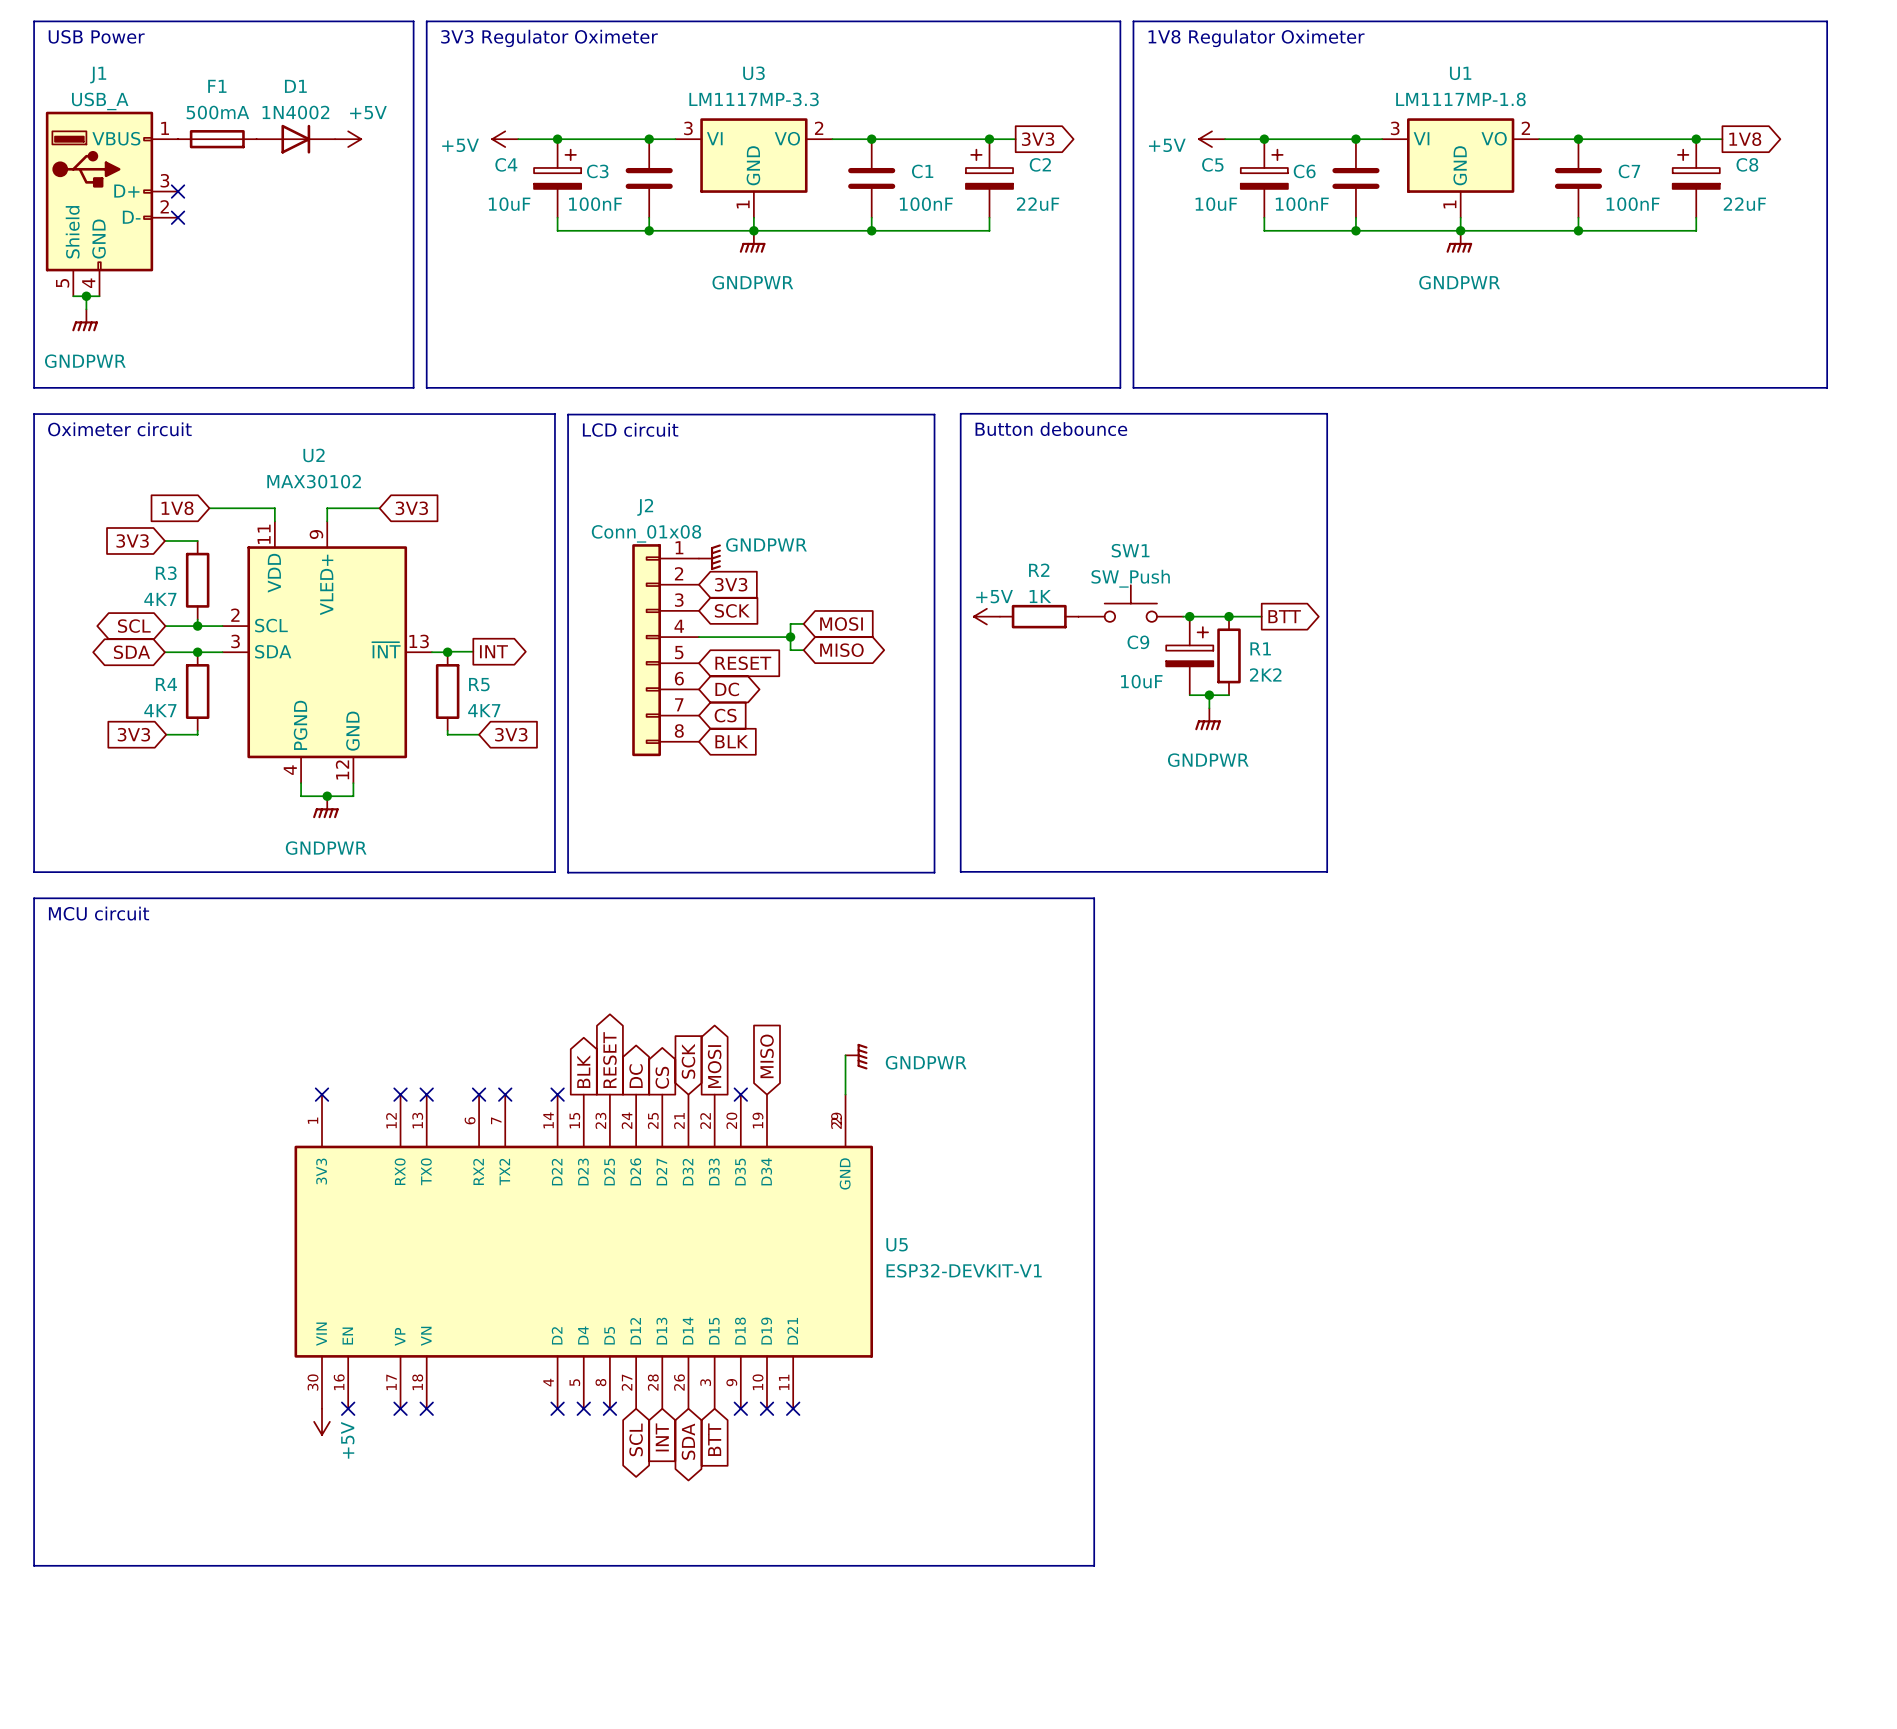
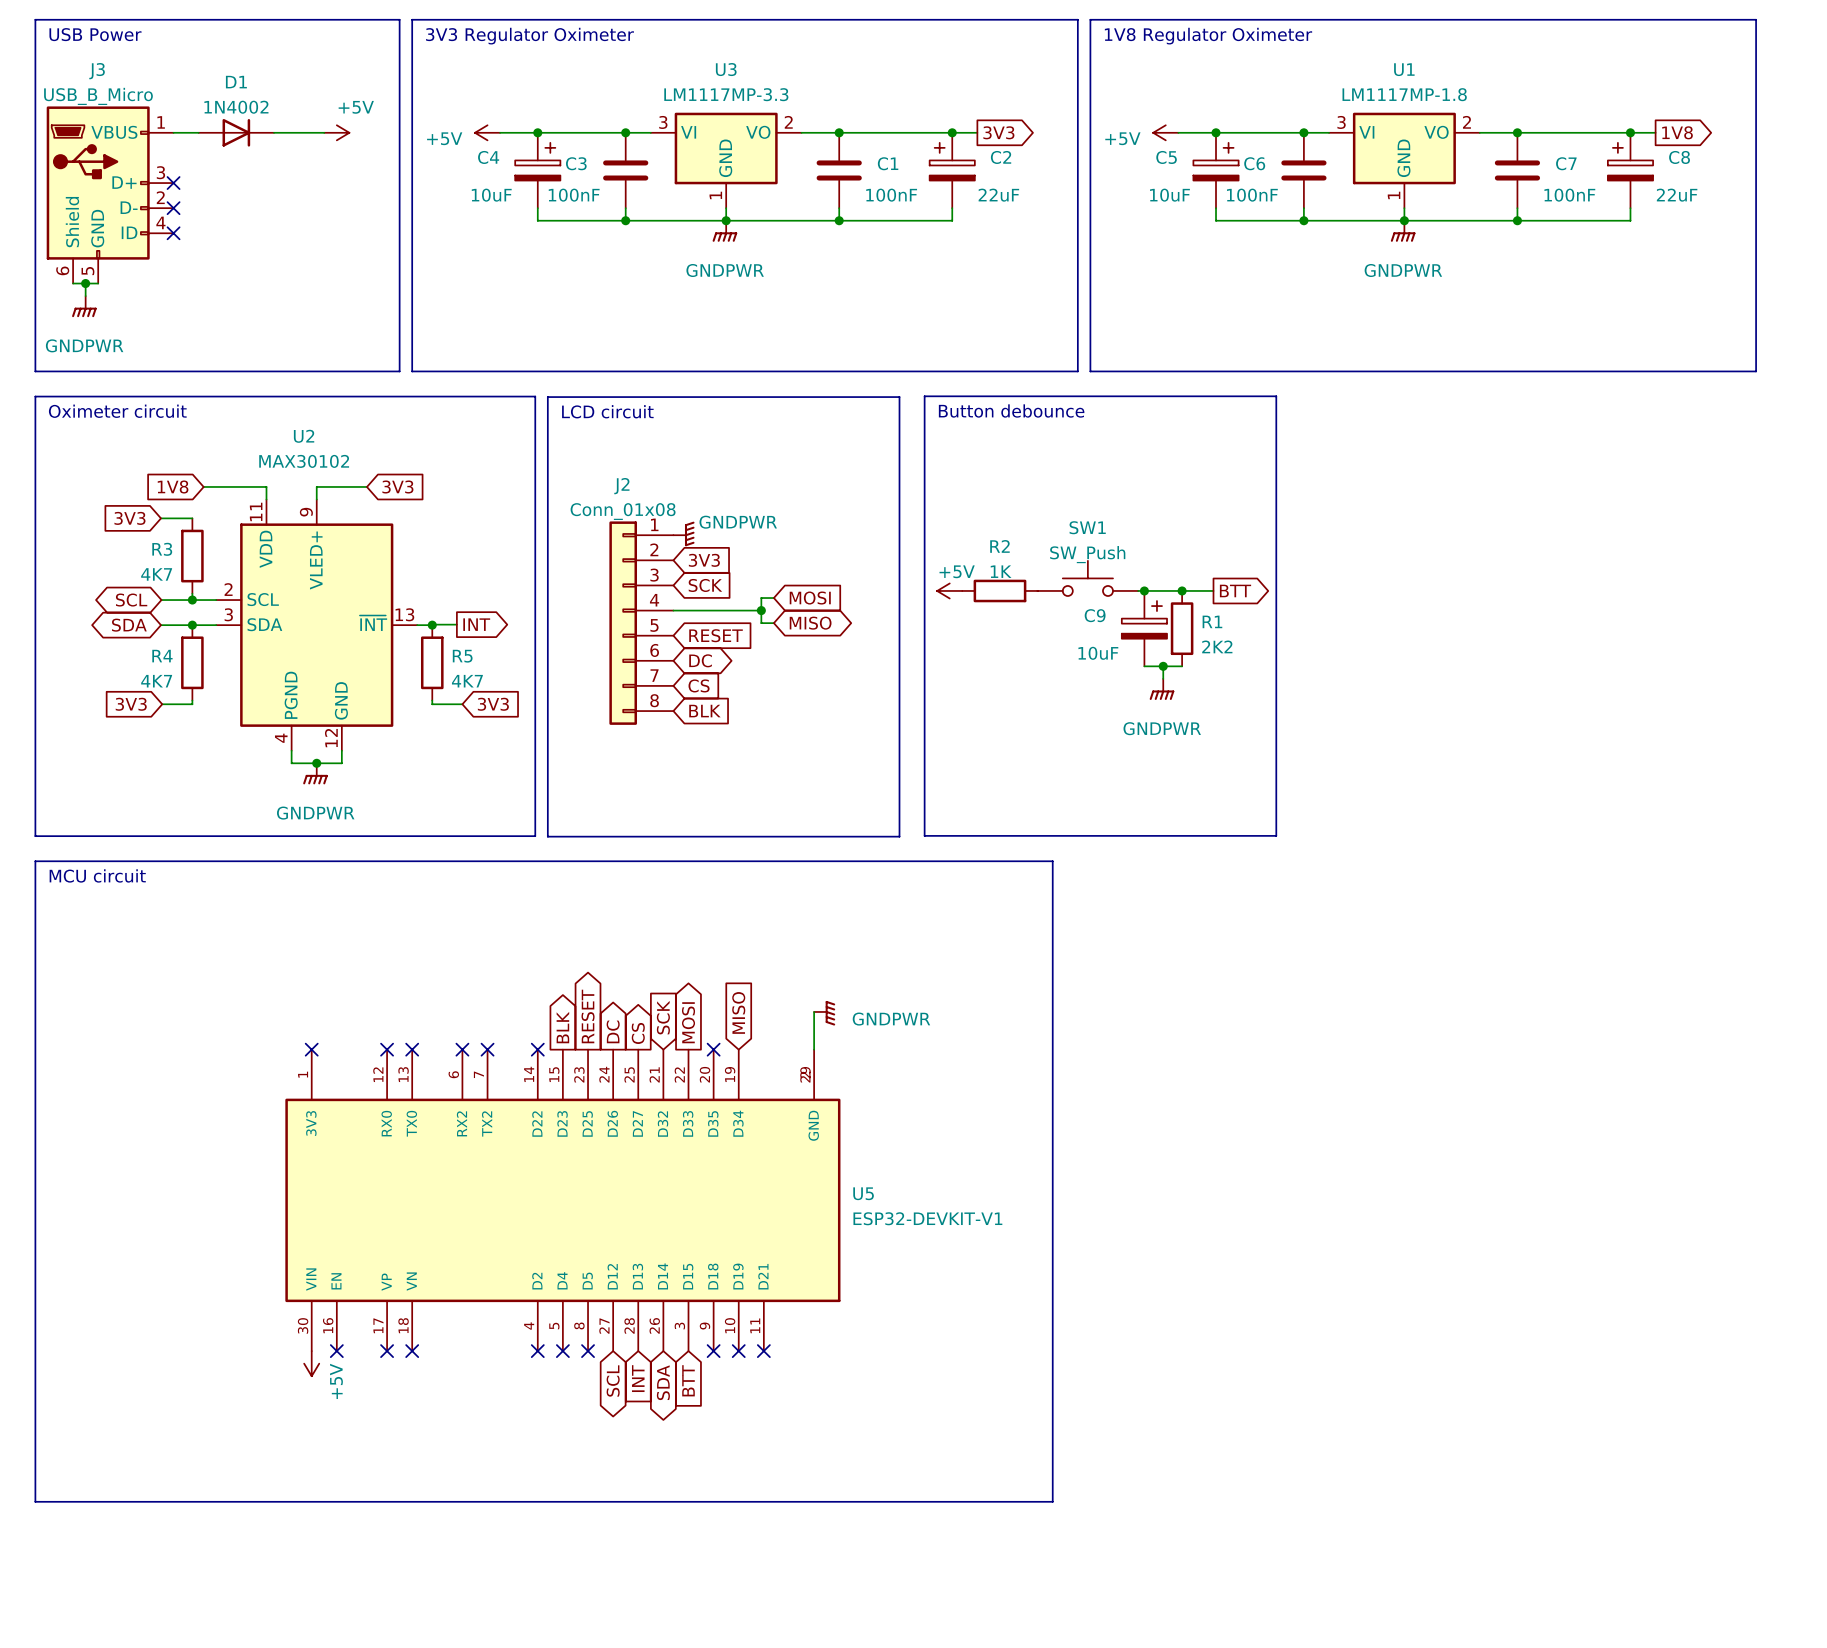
F1: 500mA (217, 139) -> none
D1 position: (295, 139) -> (236, 132)
J1: USB_A (111, 203) -> none
J3: none -> USB_B_Micro (110, 194)
no-connect mark: none -> (173, 233)

